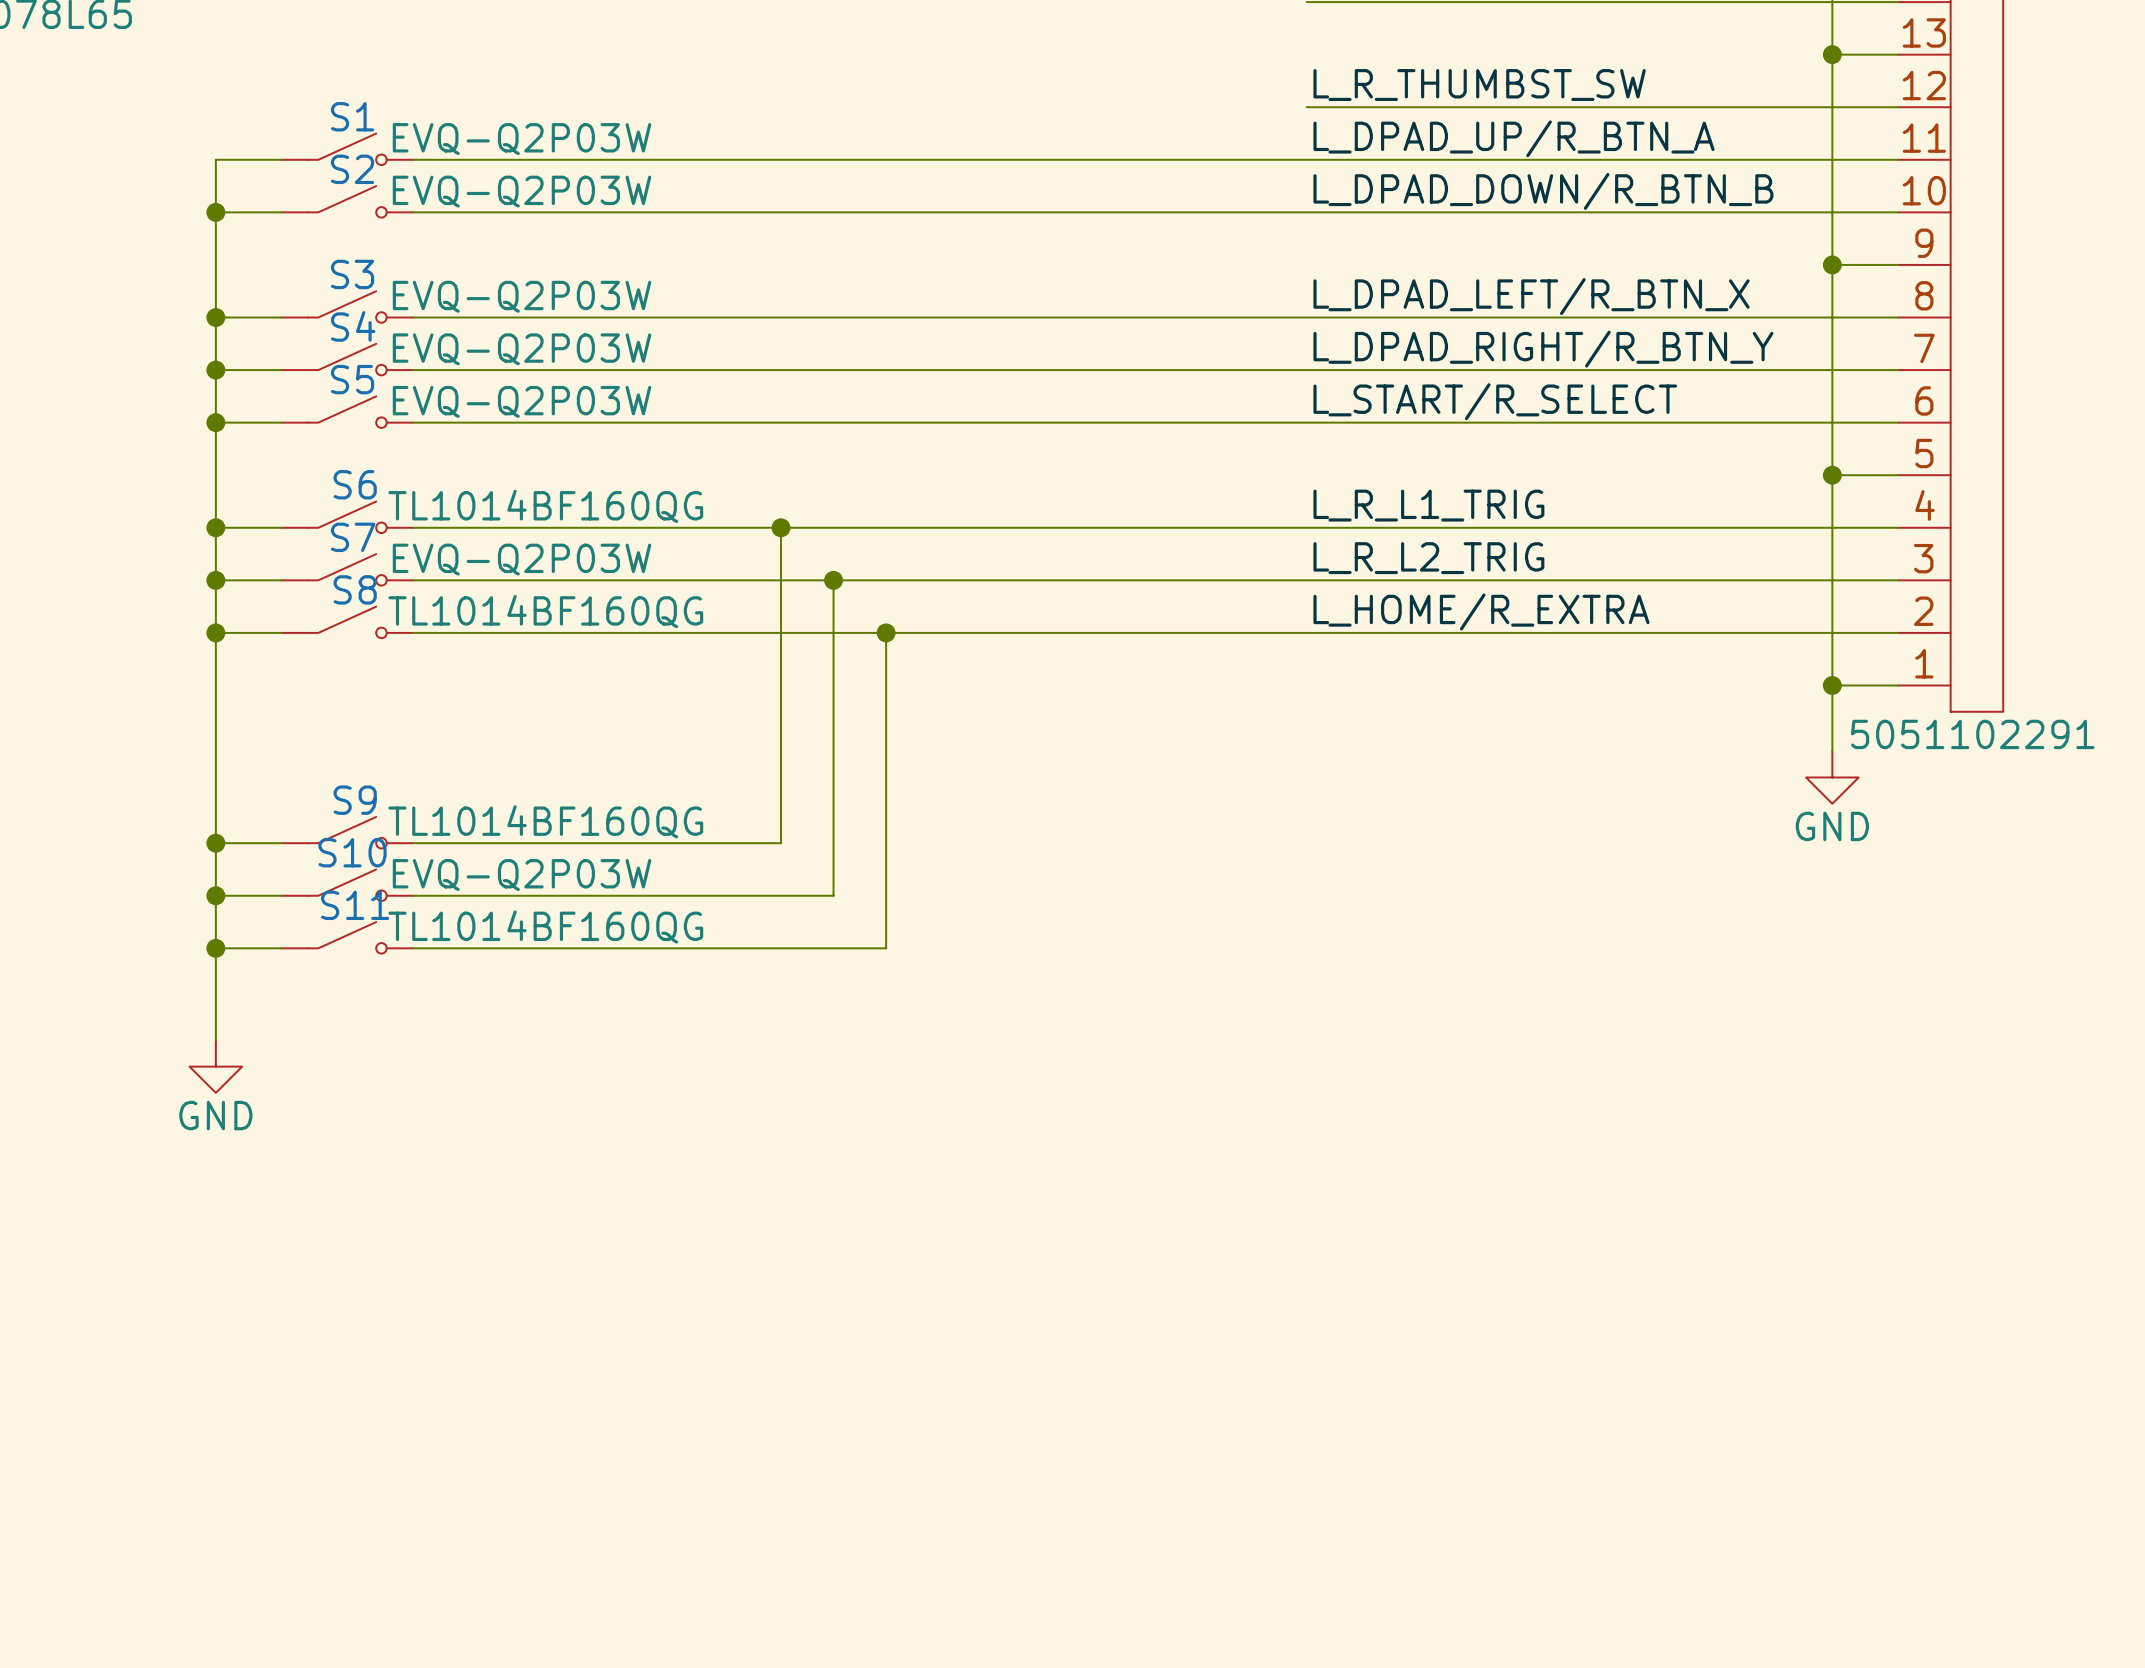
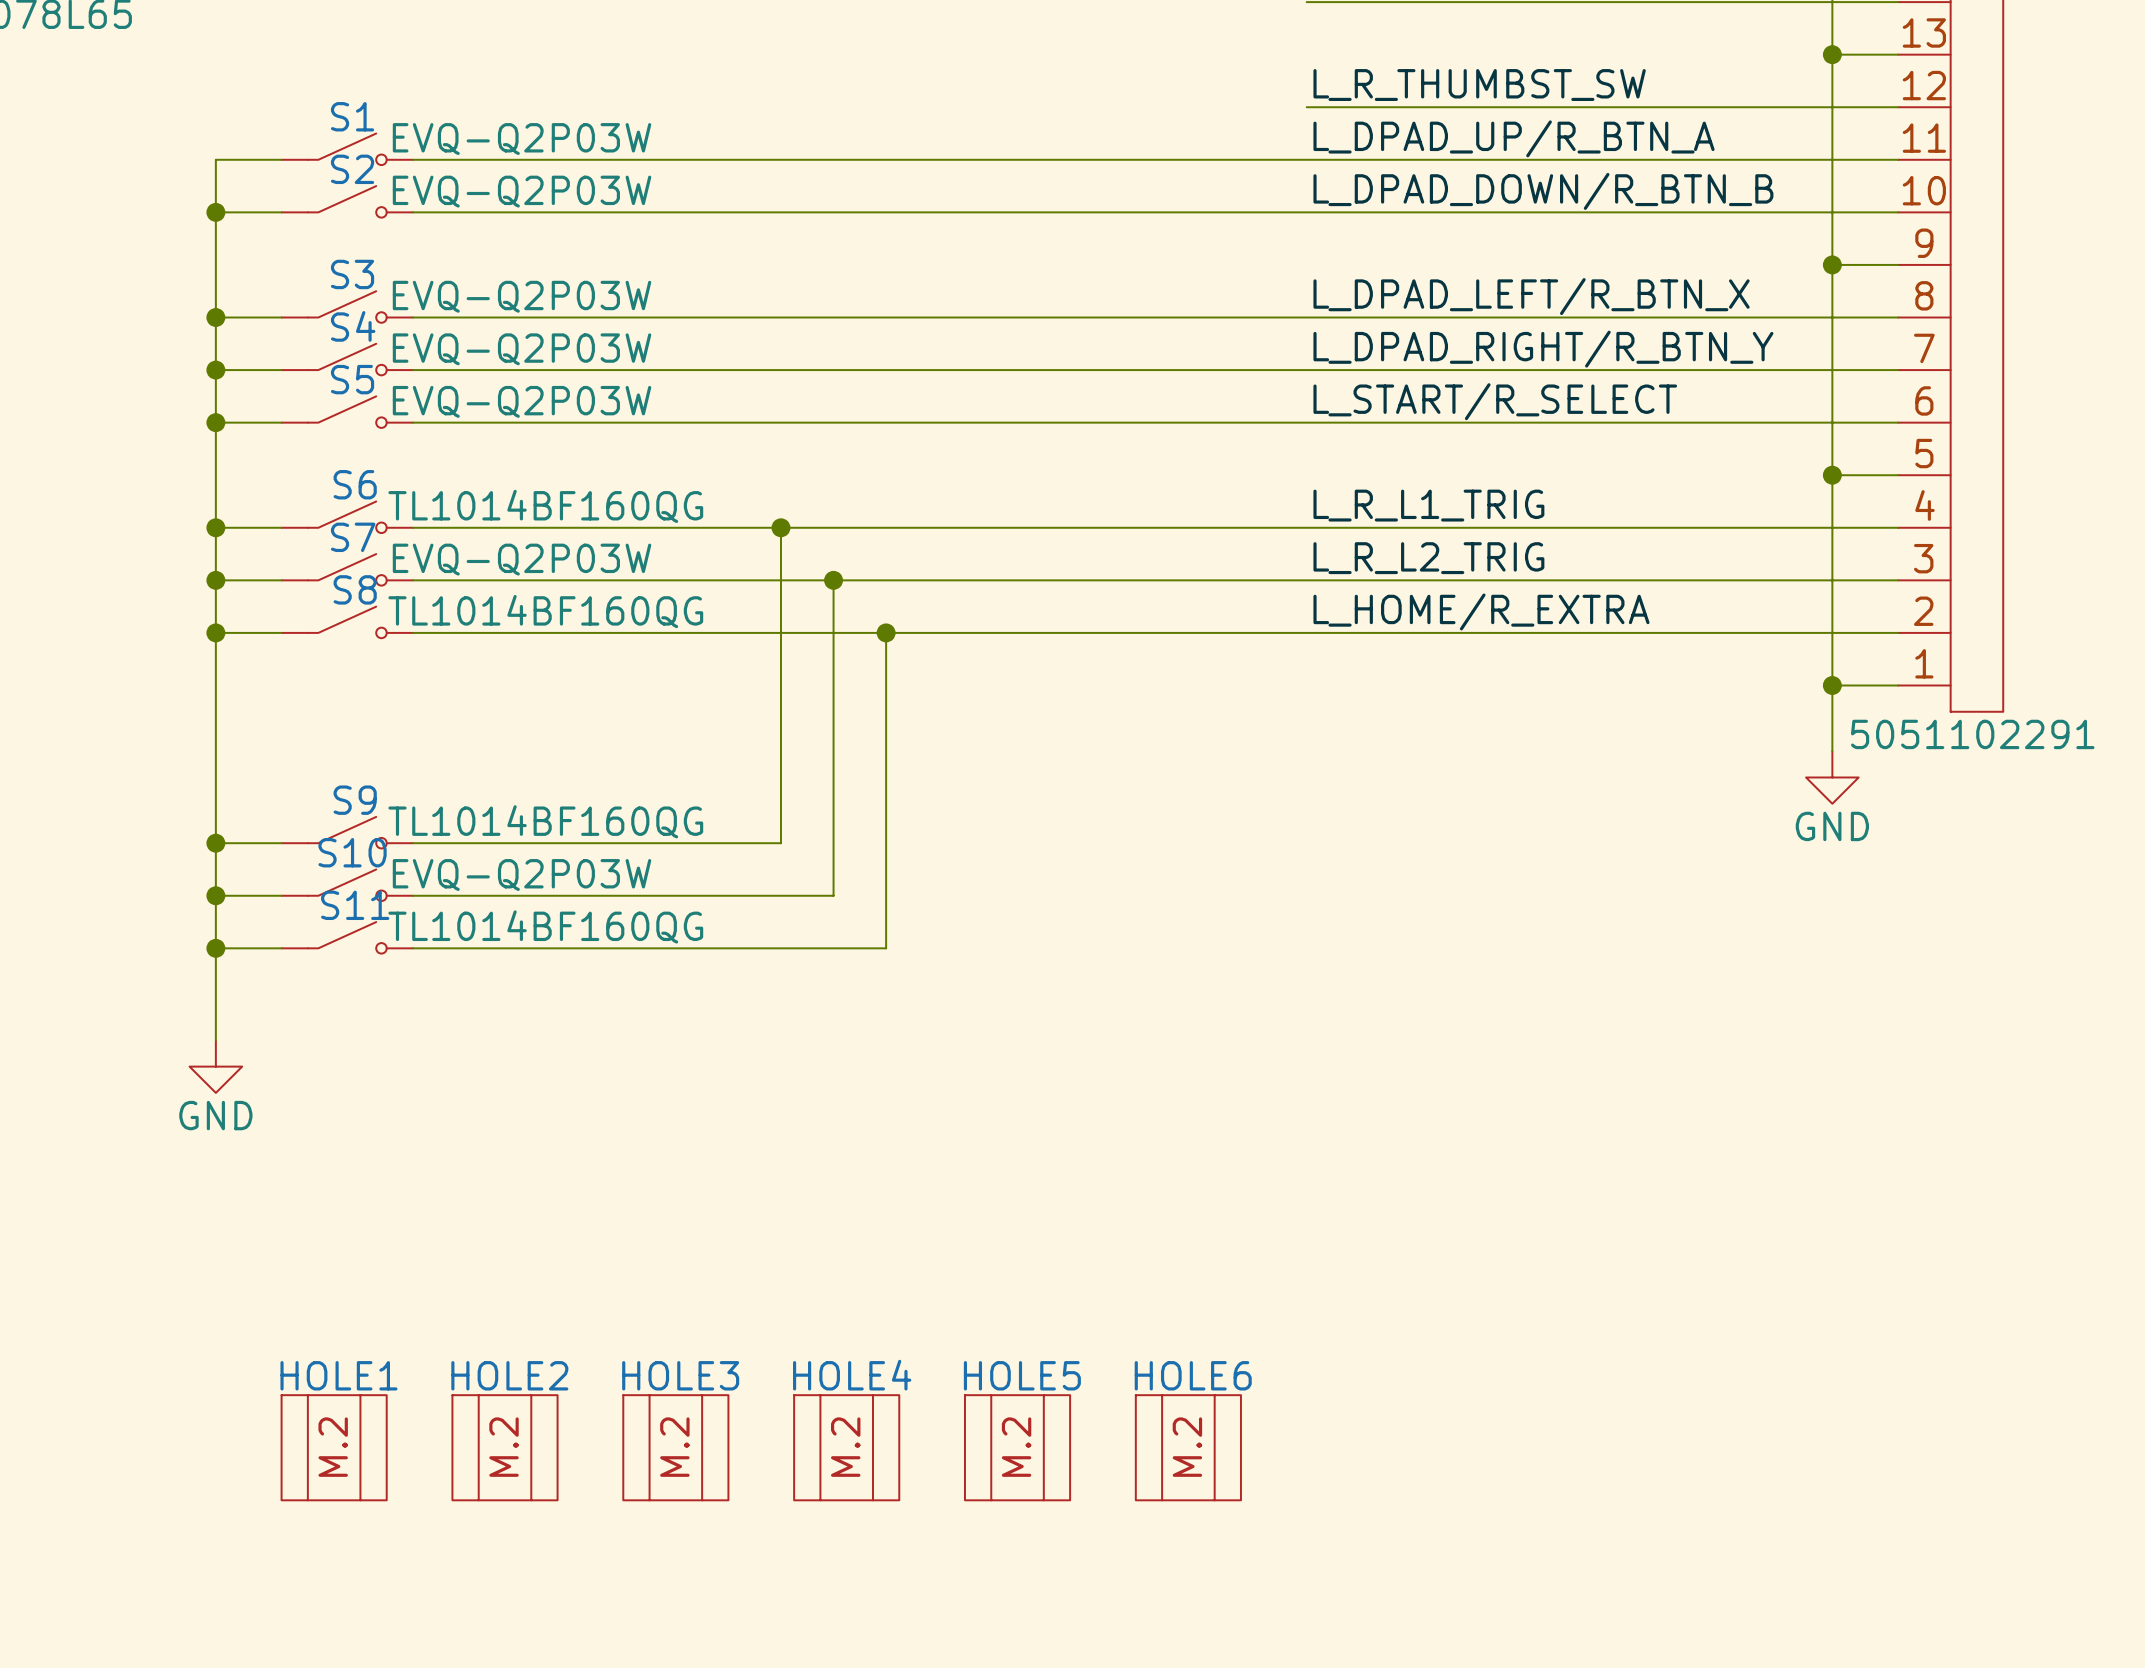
HOLE1: none -> (334, 1447)
HOLE2: none -> (505, 1447)
HOLE3: none -> (675, 1447)
HOLE4: none -> (846, 1447)
HOLE5: none -> (1017, 1447)
HOLE6: none -> (1188, 1447)

